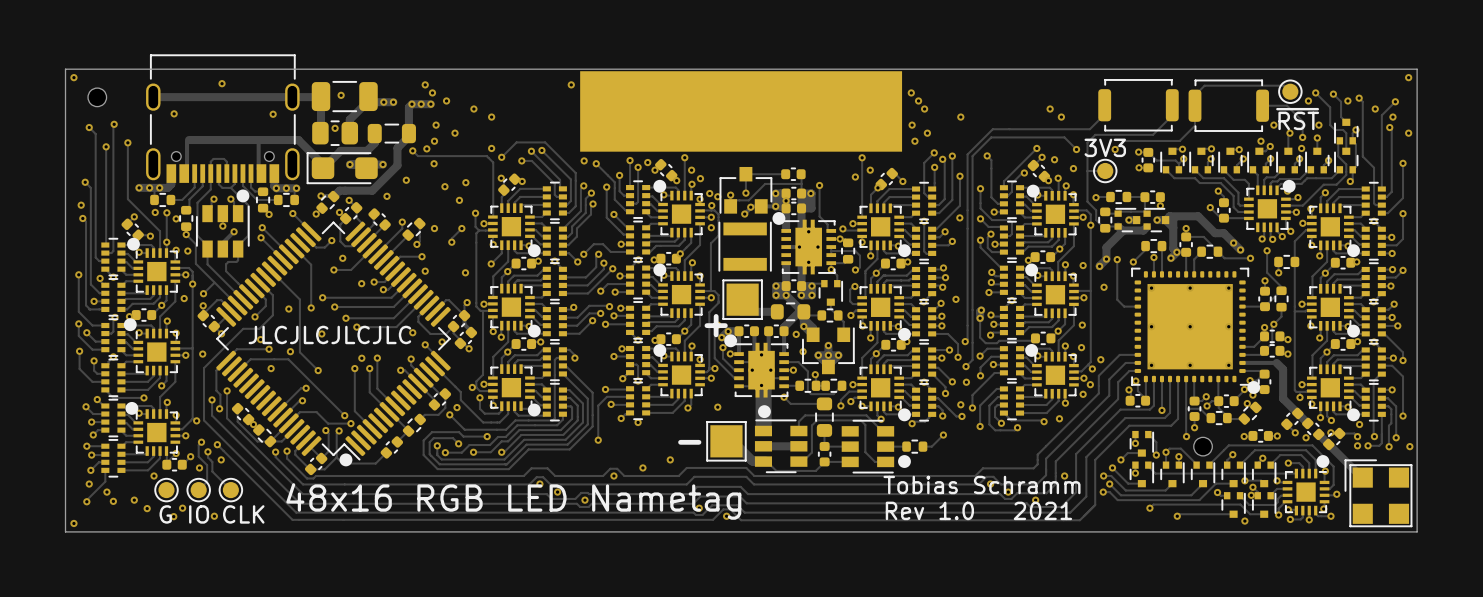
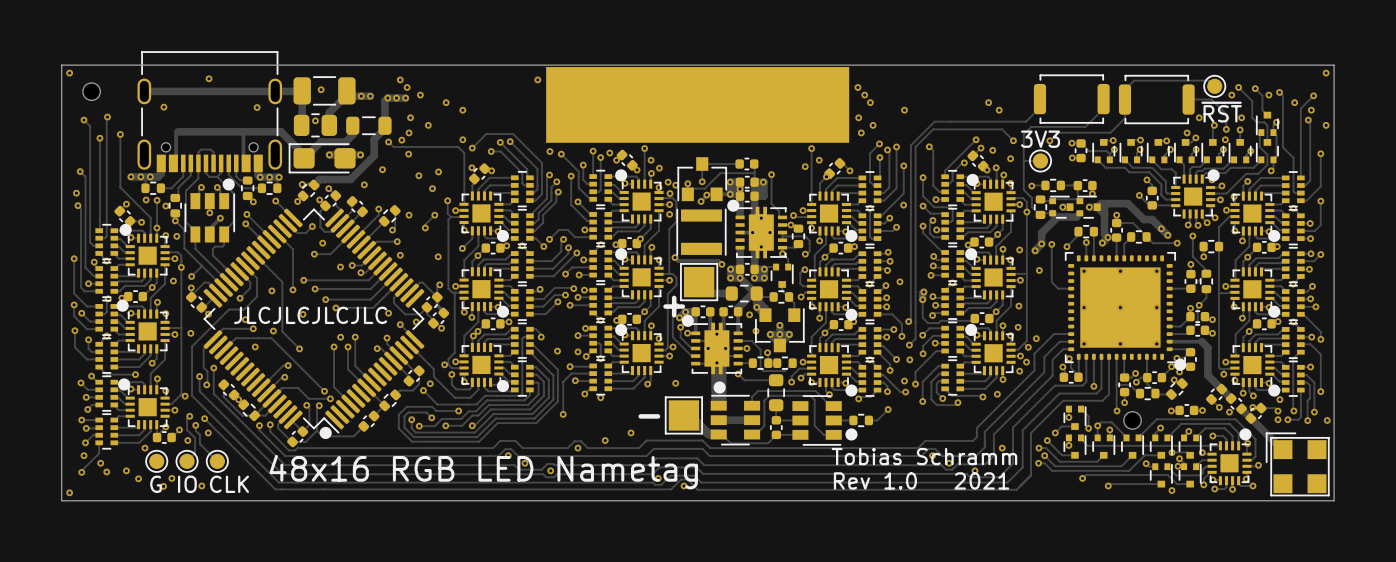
track: none -> (674, 257) (678, 260) (718, 260) (721, 264)
via: none -> (674, 257)
via: none -> (721, 264)
via: none -> (473, 335)
via: none -> (557, 351)
via: none -> (577, 351)

